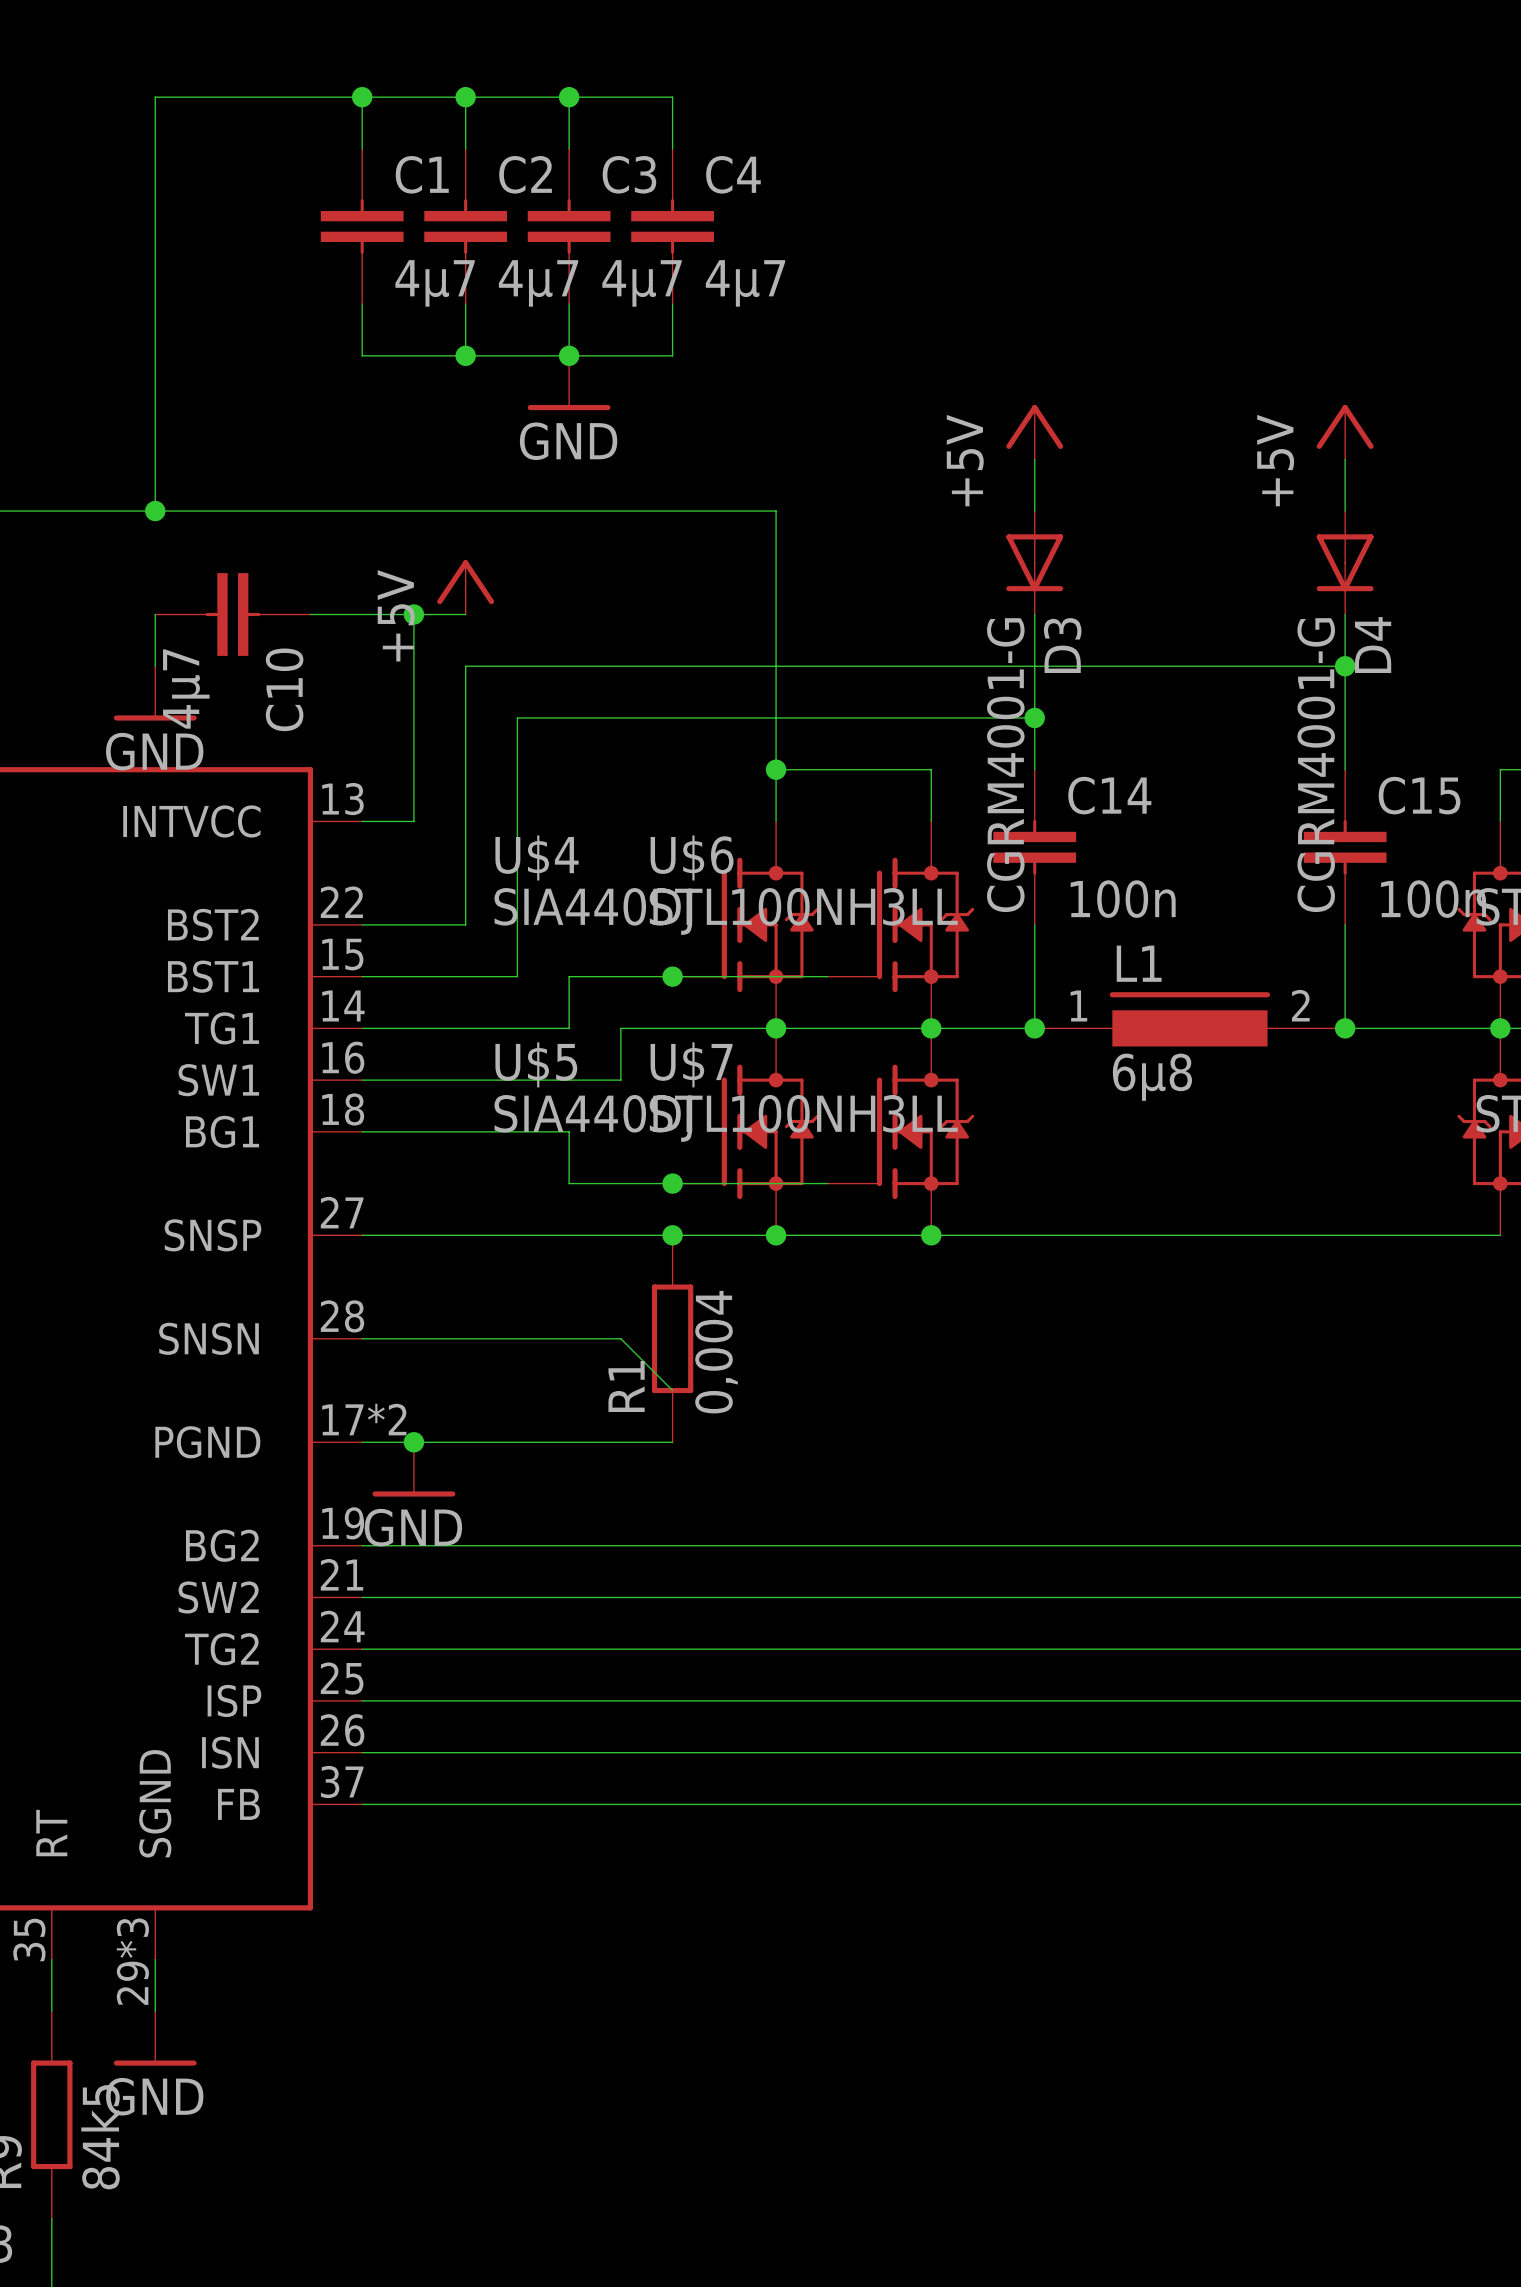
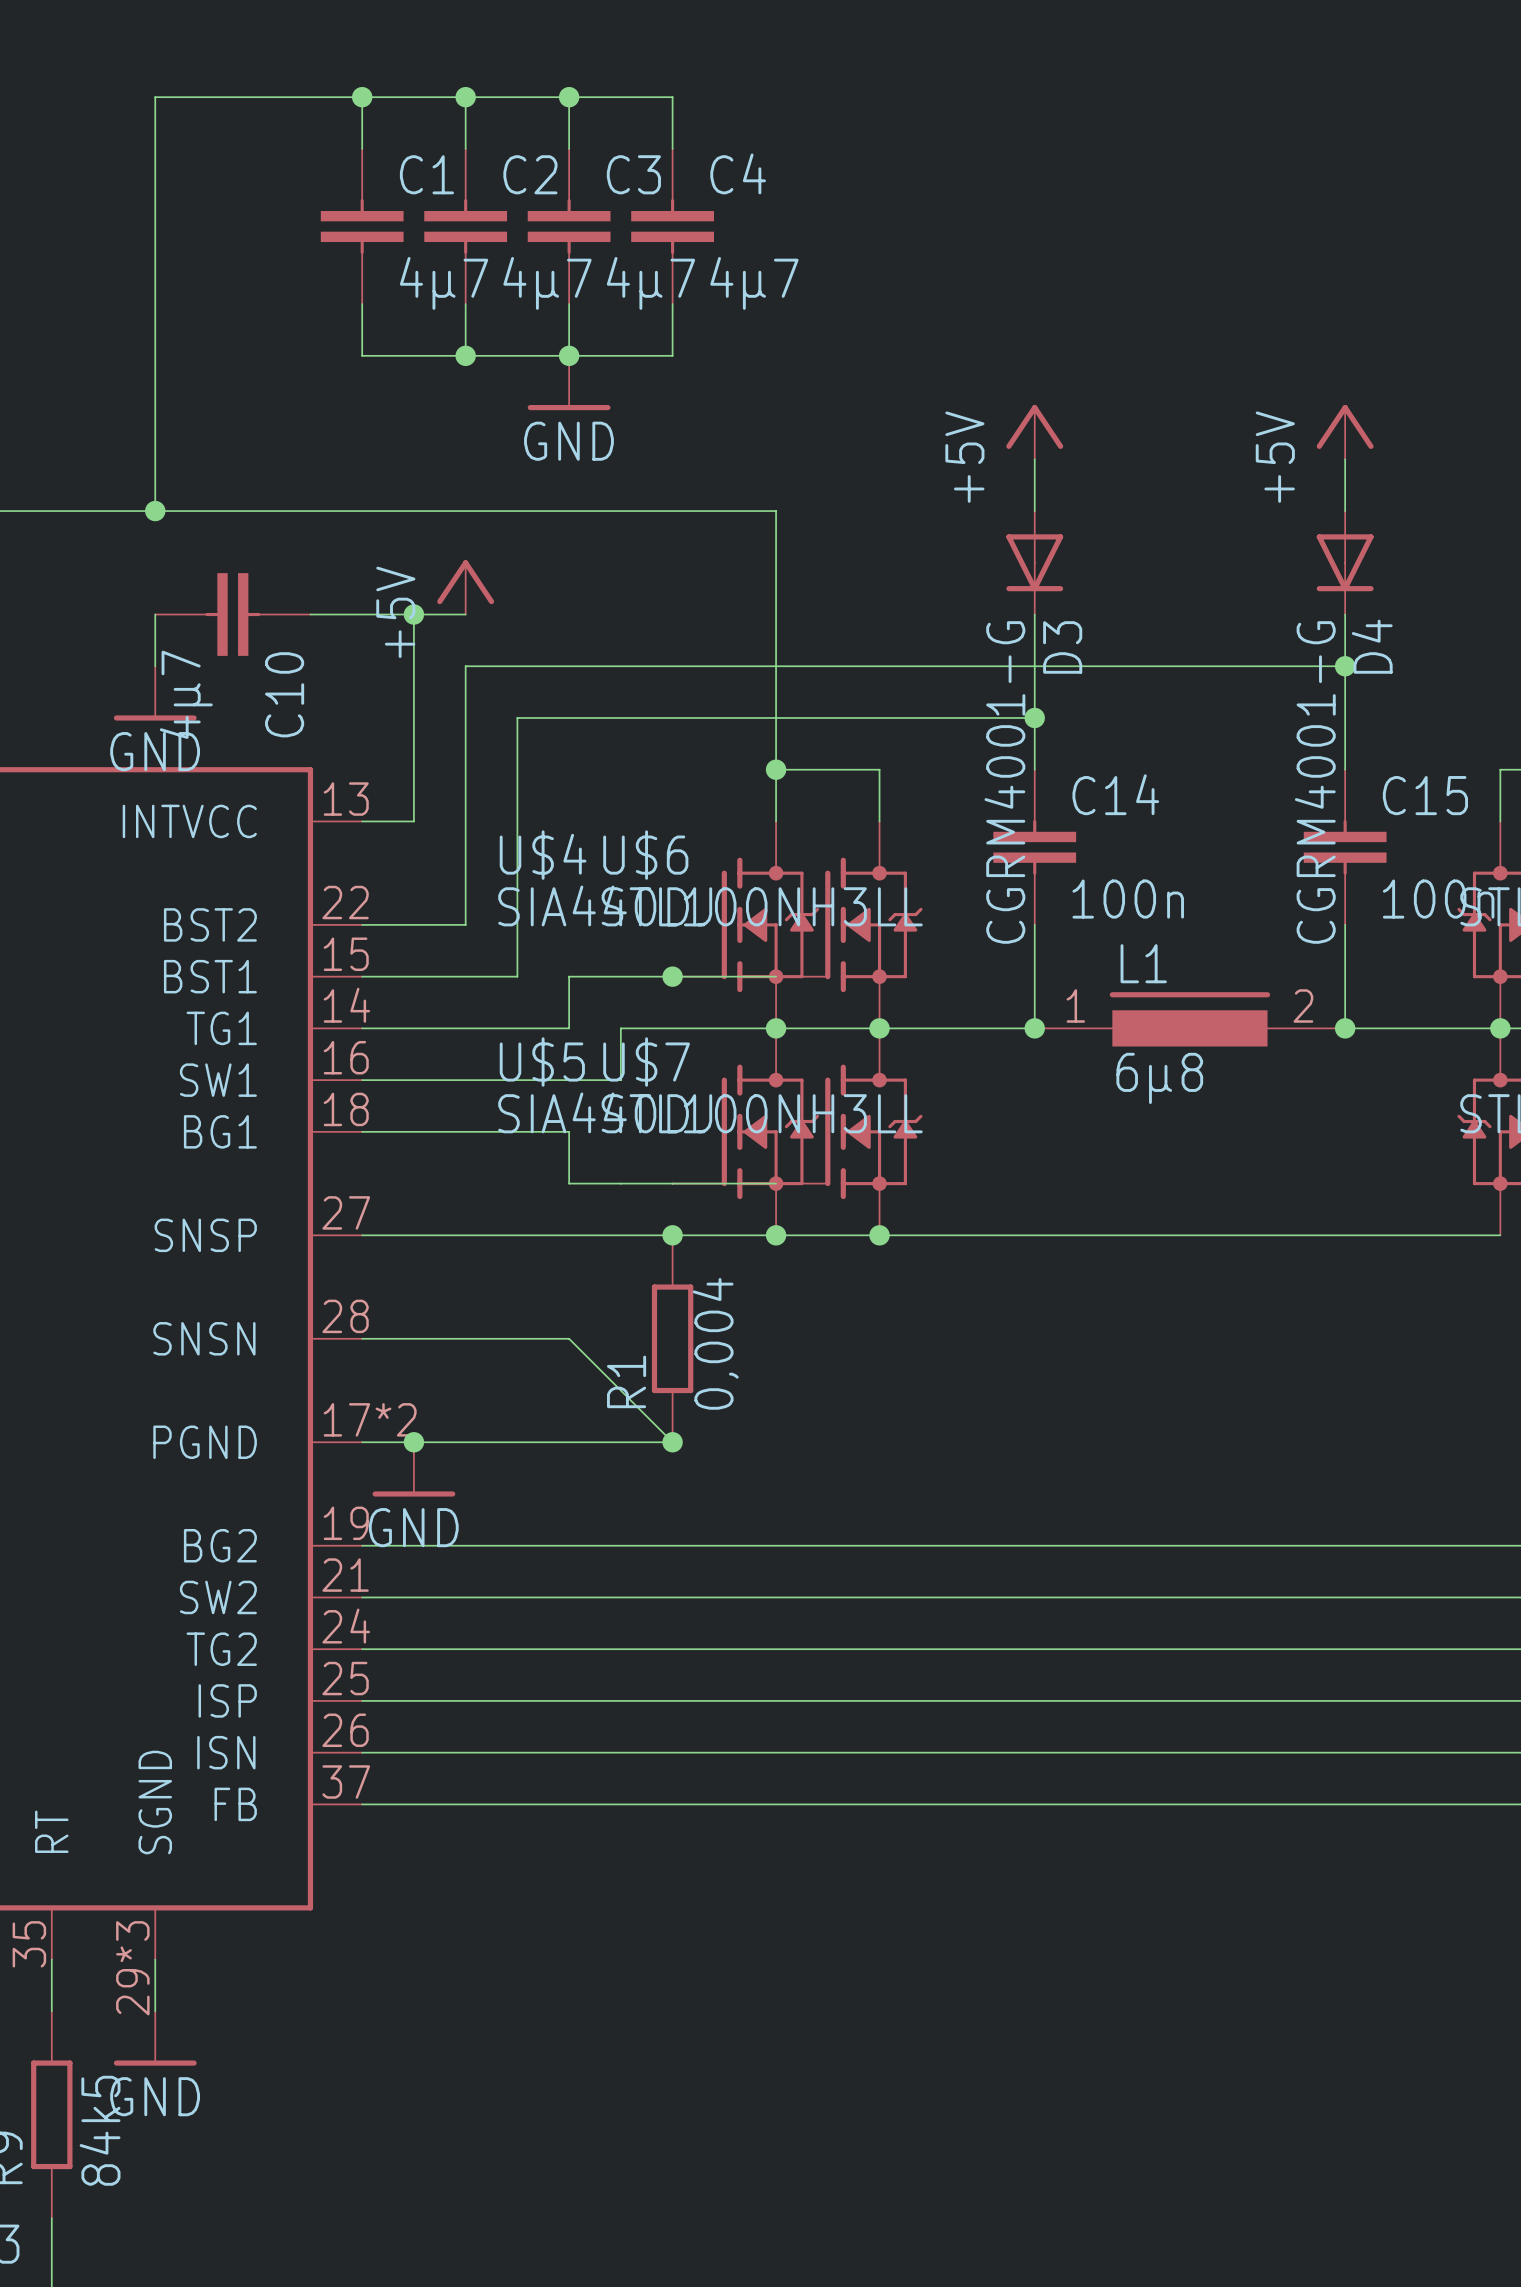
wire: (879, 769) (931, 769) (931, 821) -> (879, 769) (879, 821)
U$6 position: (901, 924) -> (849, 924)
junction position: (931, 1028) -> (879, 1028)
U$7 position: (901, 1131) -> (849, 1131)
junction: (672, 1183) -> none
junction position: (931, 1235) -> (879, 1235)
wire: (569, 1338) (620, 1338) (672, 1390) -> (569, 1338) (672, 1442)
junction: none -> (672, 1442)

